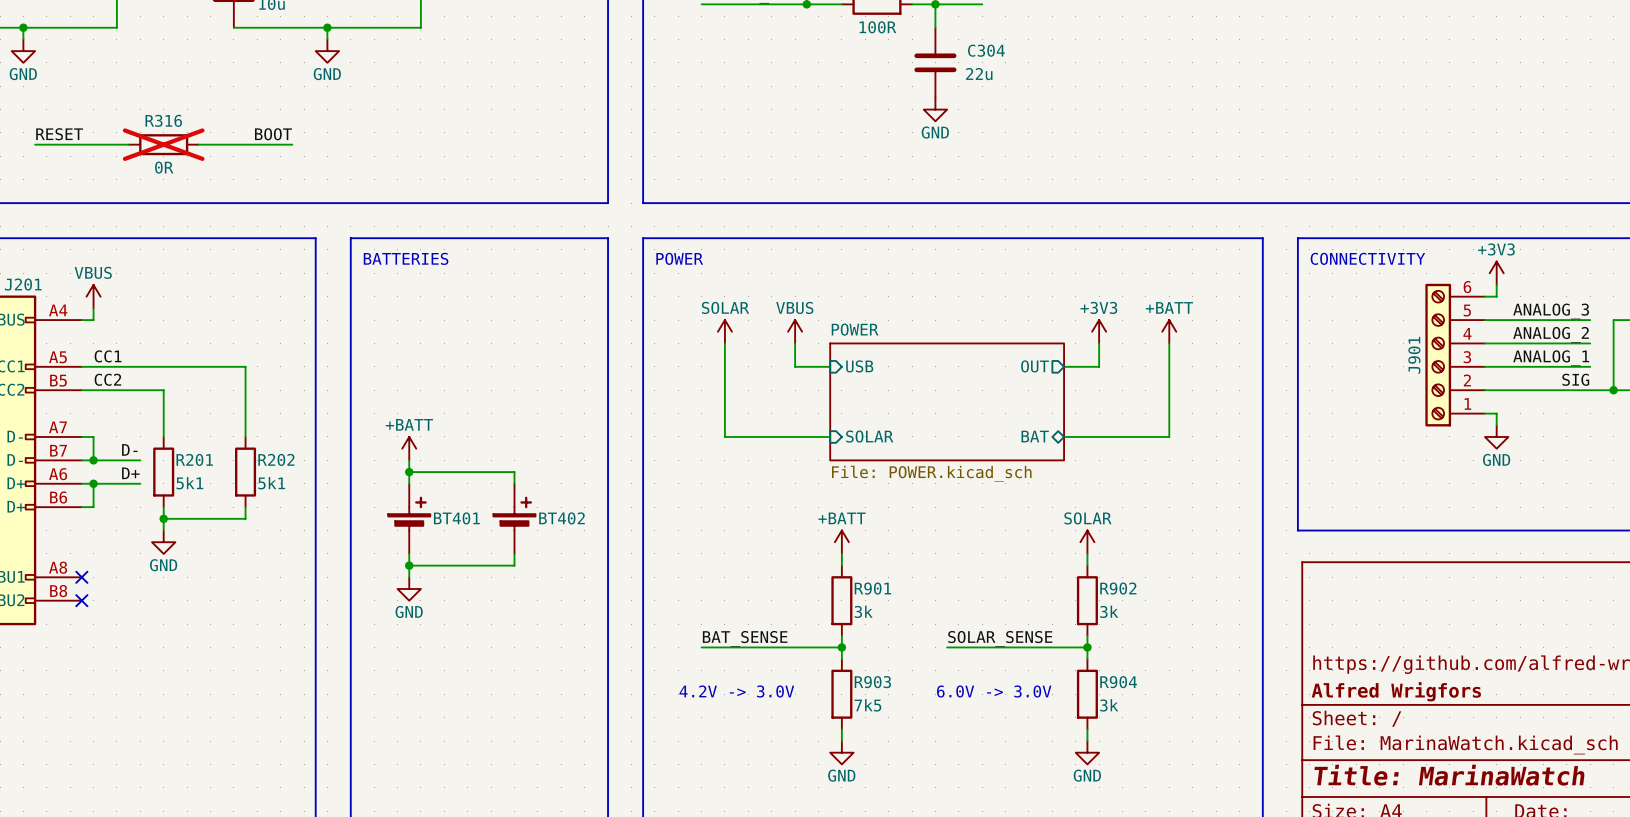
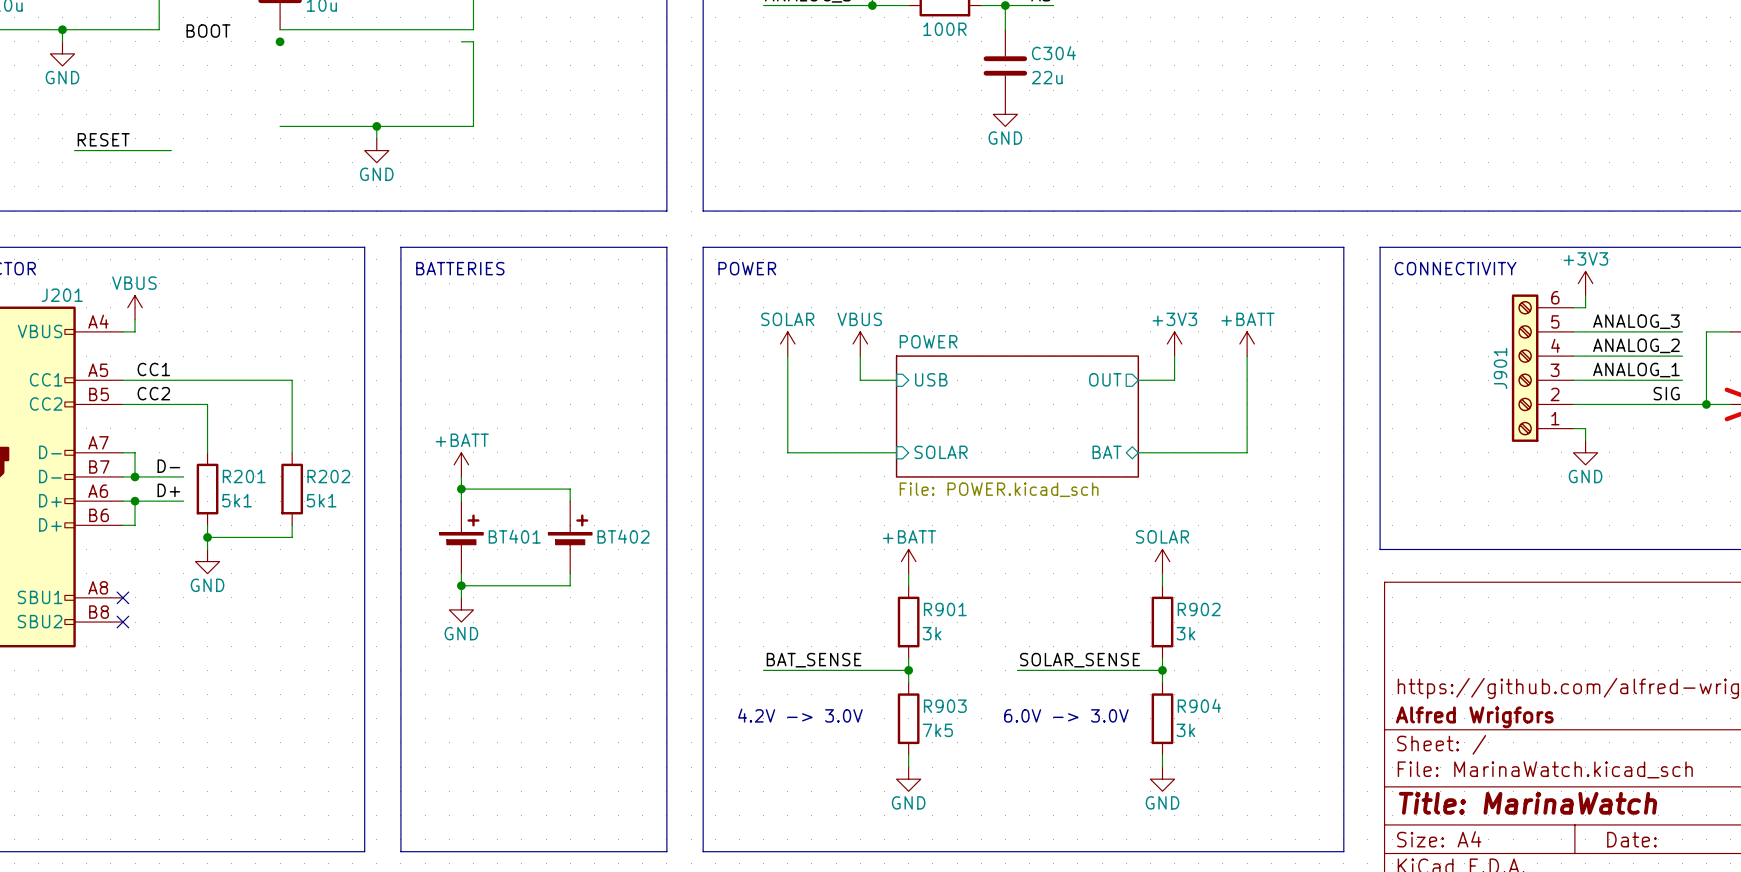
wire: (327, 27) (327, 39) -> (376, 126) (376, 138)
junction: (327, 27) -> none
label: none -> BOOT (208, 31)
junction: none -> (280, 41)
wire: none -> (461, 41) (473, 41) (473, 126) (280, 126)
power symbol position: GND (327, 51) -> GND (376, 150)
junction: none -> (376, 126)
label: BOOT (273, 134) -> none
R316: 0R (163, 144) -> none
wire: (198, 144) (292, 144) -> none

